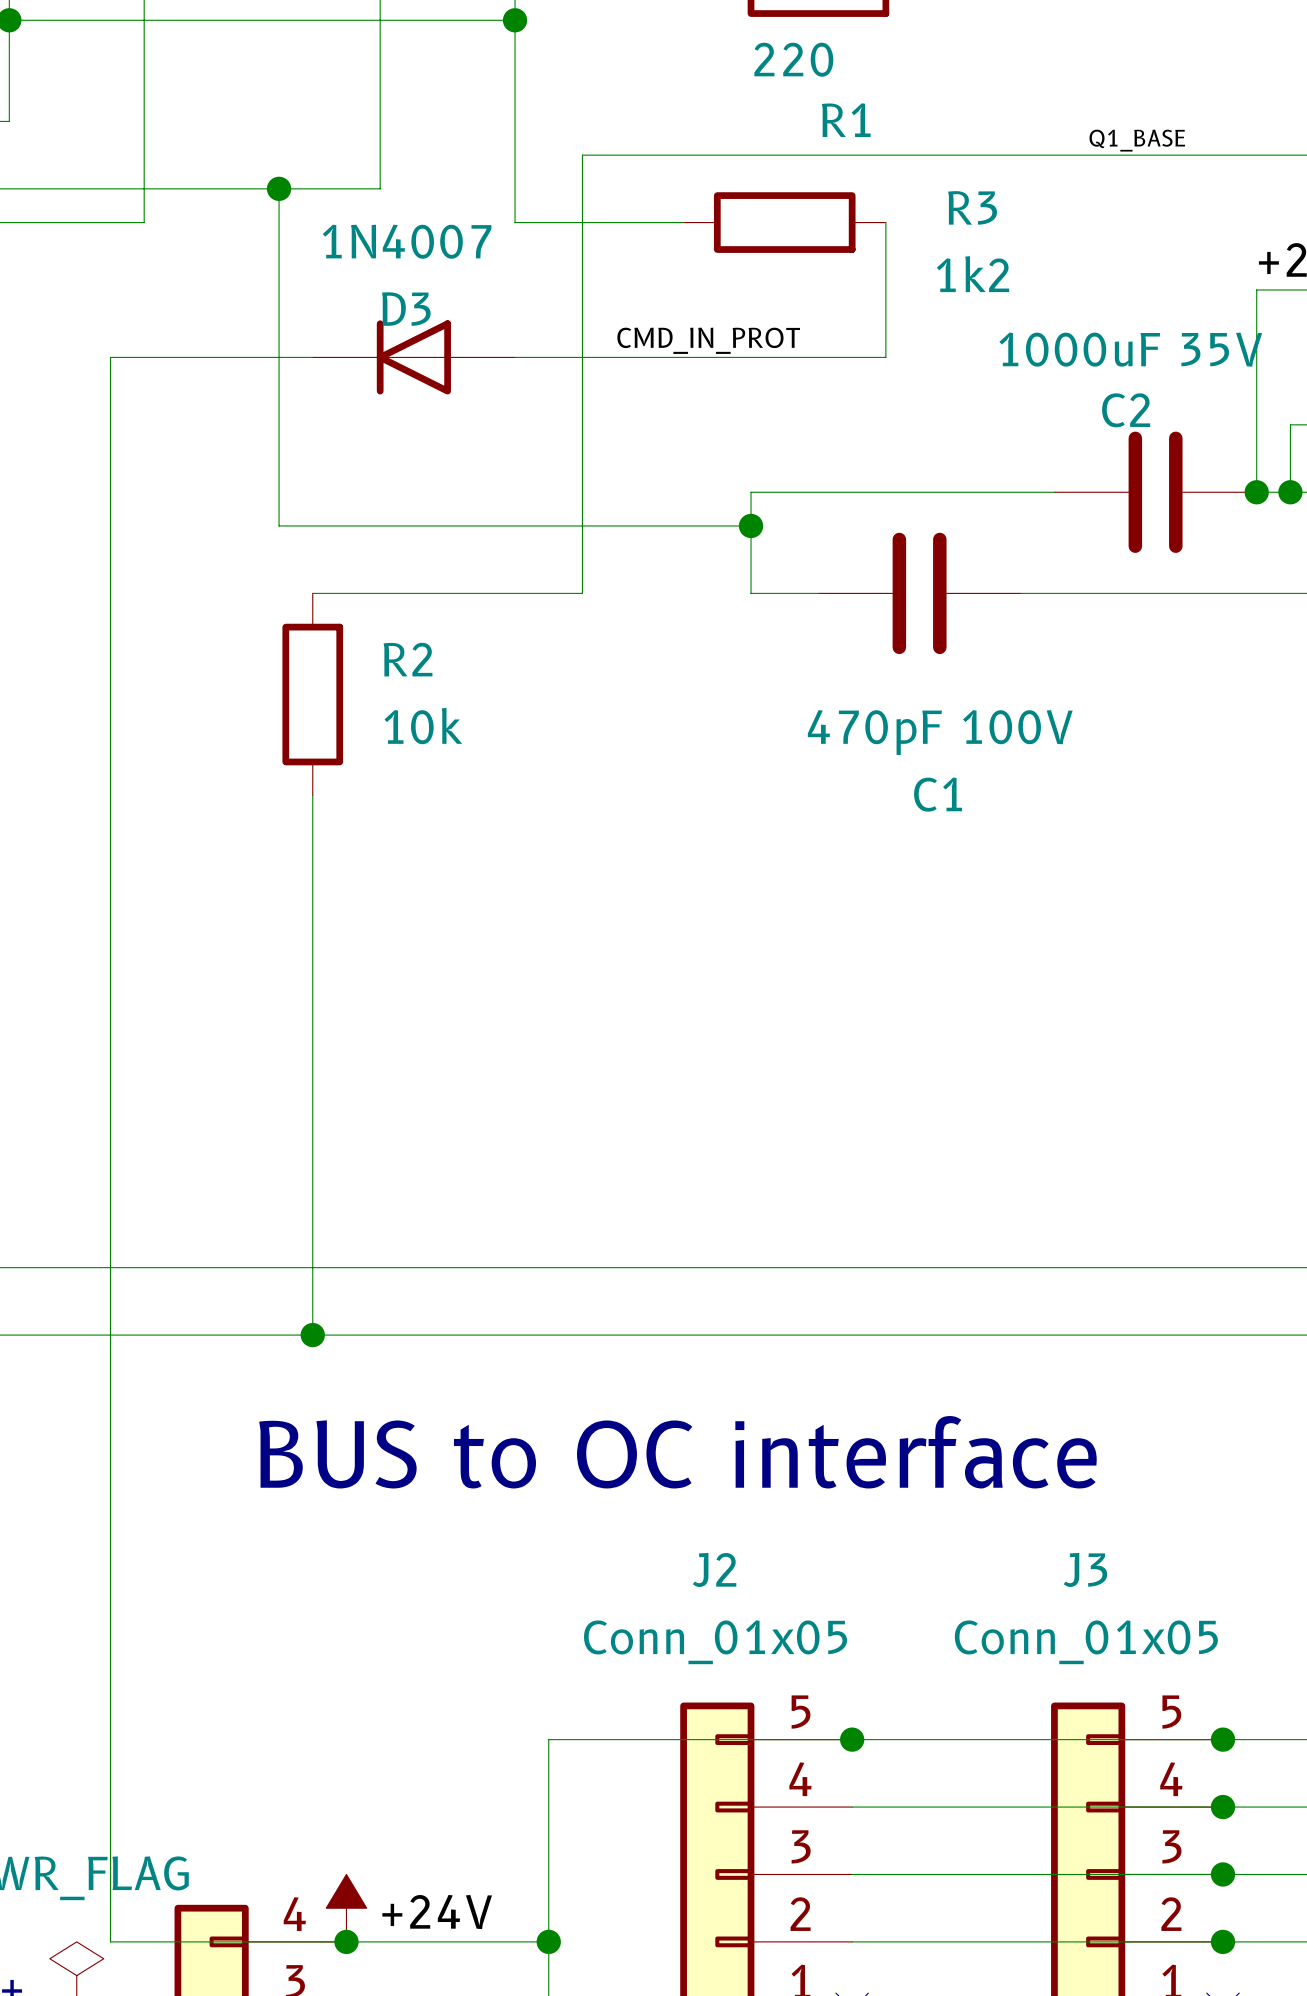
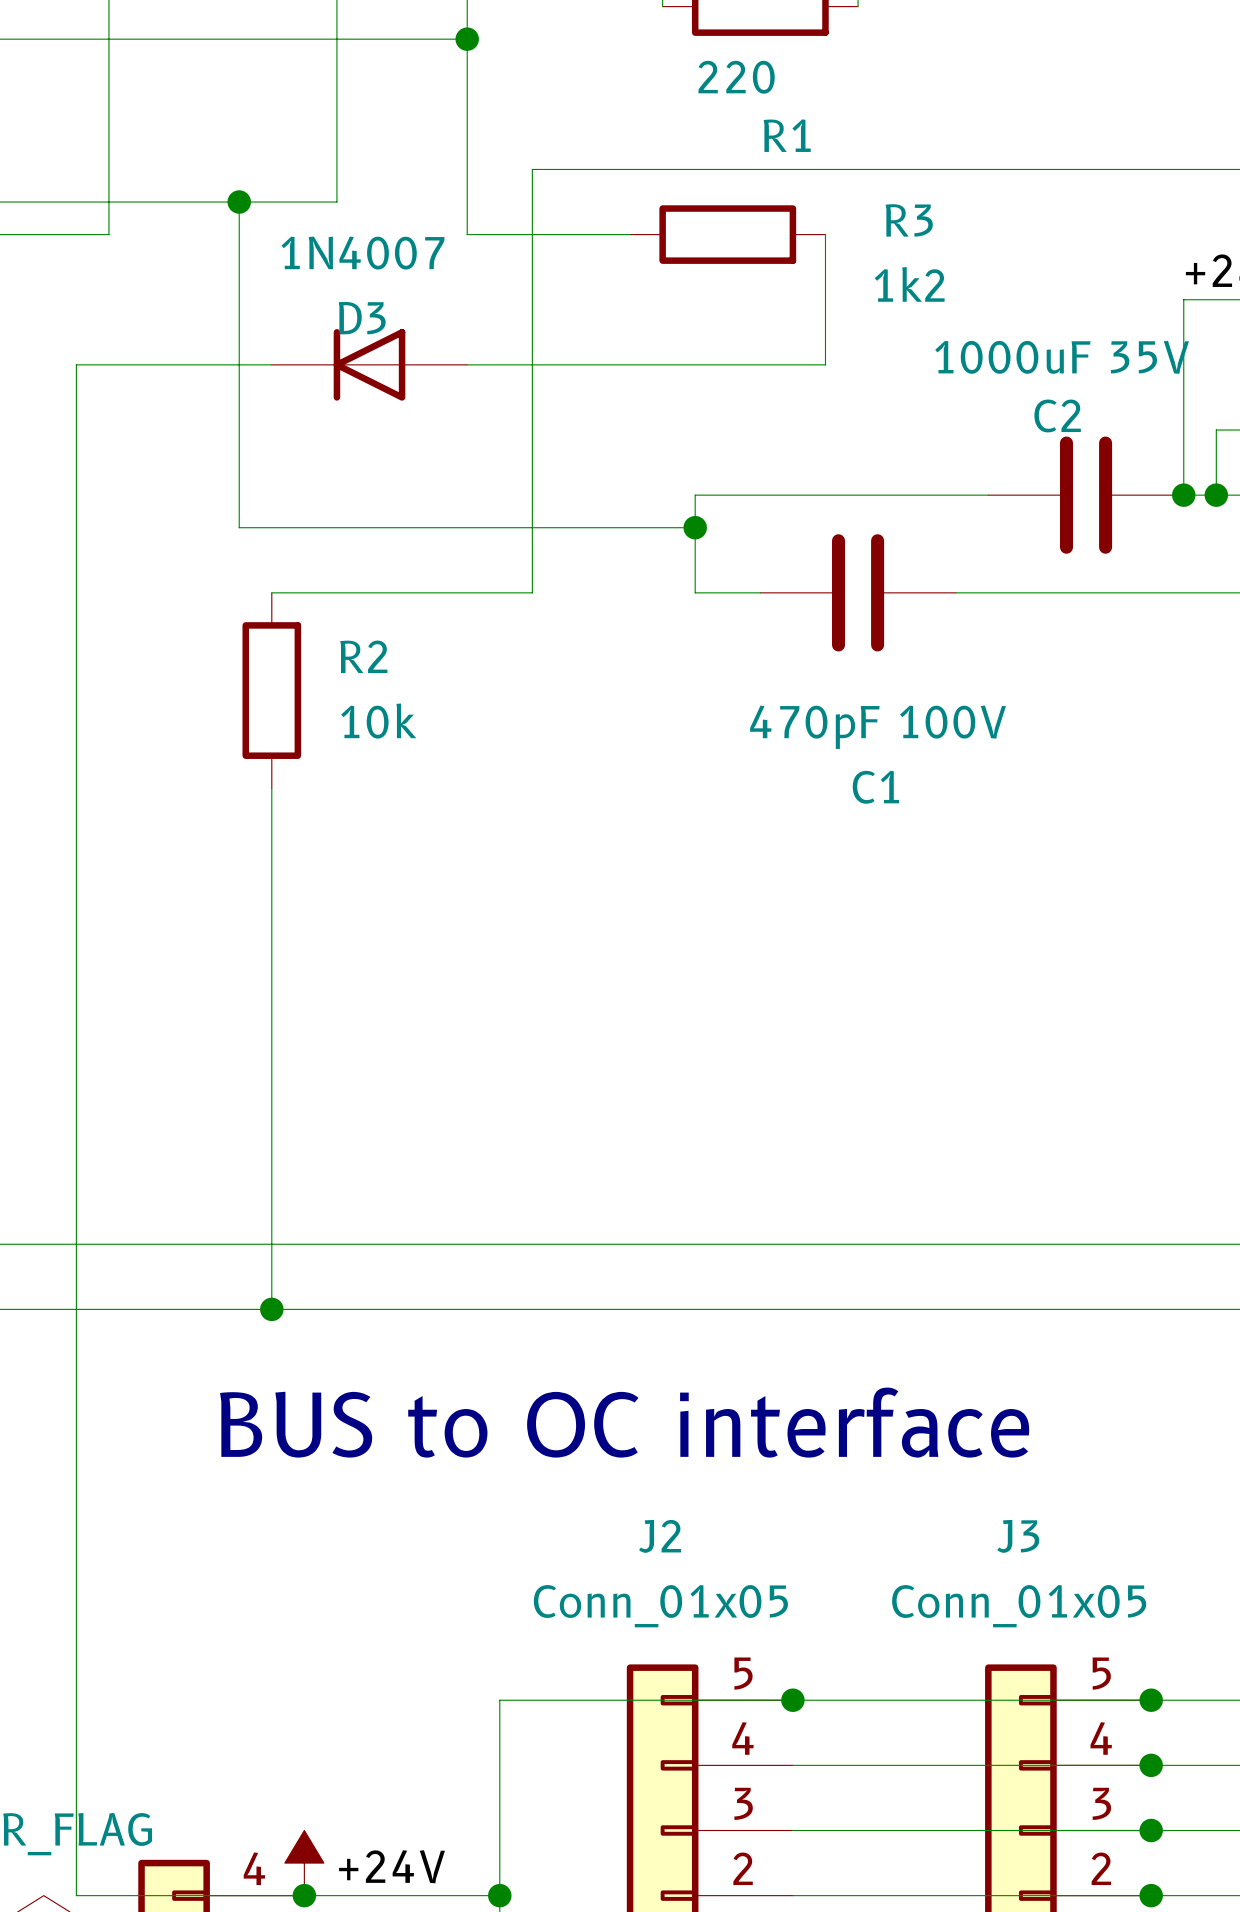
label: Q1_BASE (1137, 140) -> none
label: CMD_IN_PROT (708, 340) -> none

